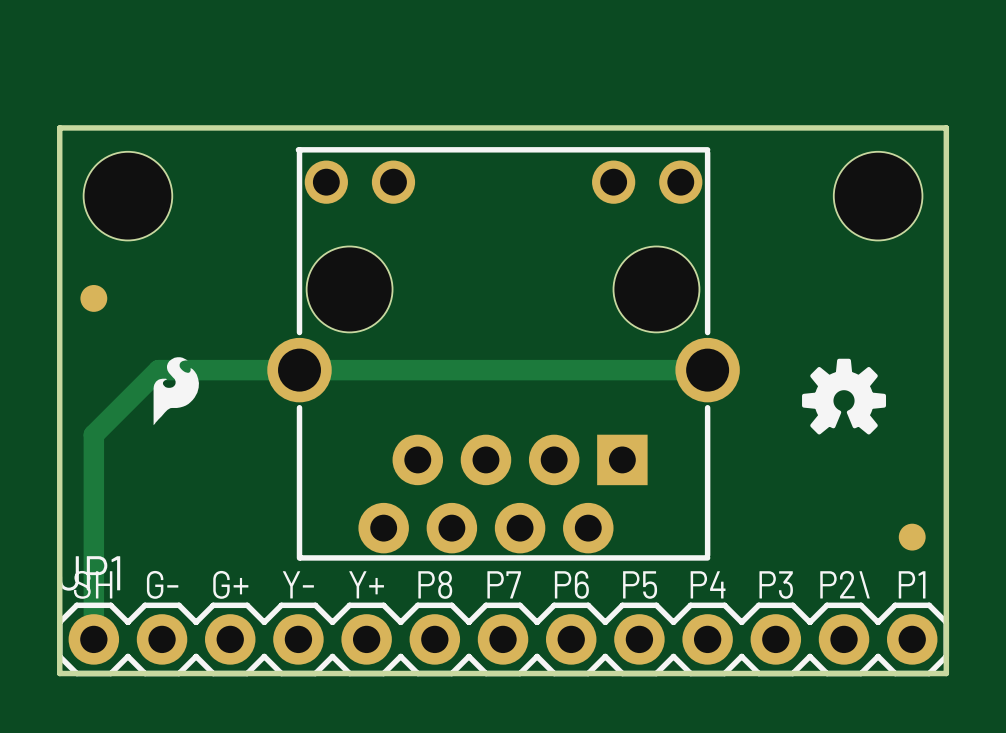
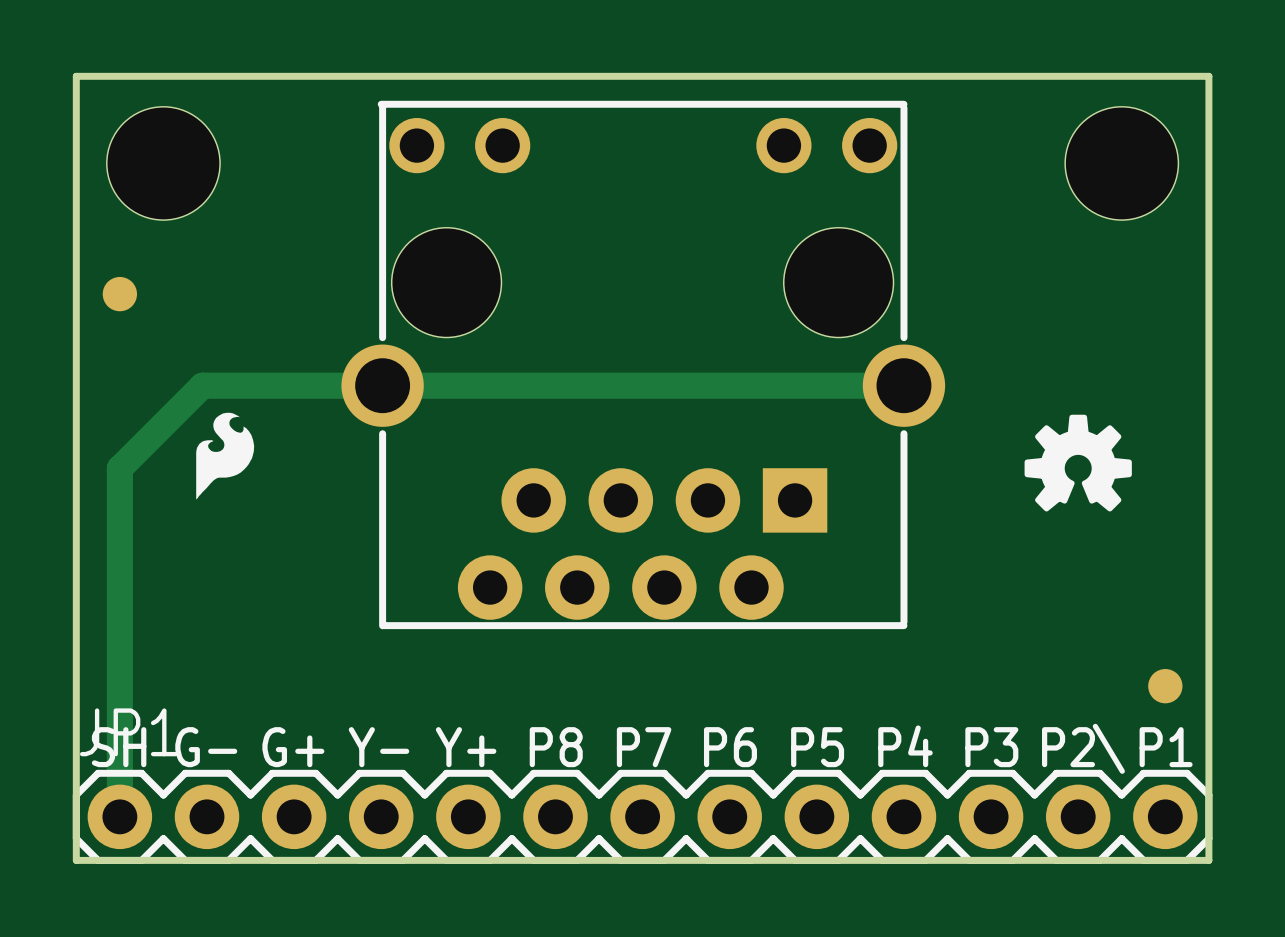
board edge: (59, 127) (946, 127) -> (76, 163) (76, 76) (1208, 76) (1208, 163)
part position: (127, 196) -> (163, 163)
part position: (878, 196) -> (1121, 163)
part position: (93, 298) -> (119, 294)
part position: (503, 353) -> (643, 365)
track: (707, 370) (158, 370) (93, 434) -> (903, 385) (202, 385) (119, 468) (119, 555)
drawing position: (176, 391) -> (225, 456)
drawing position: (844, 396) -> (1078, 463)

